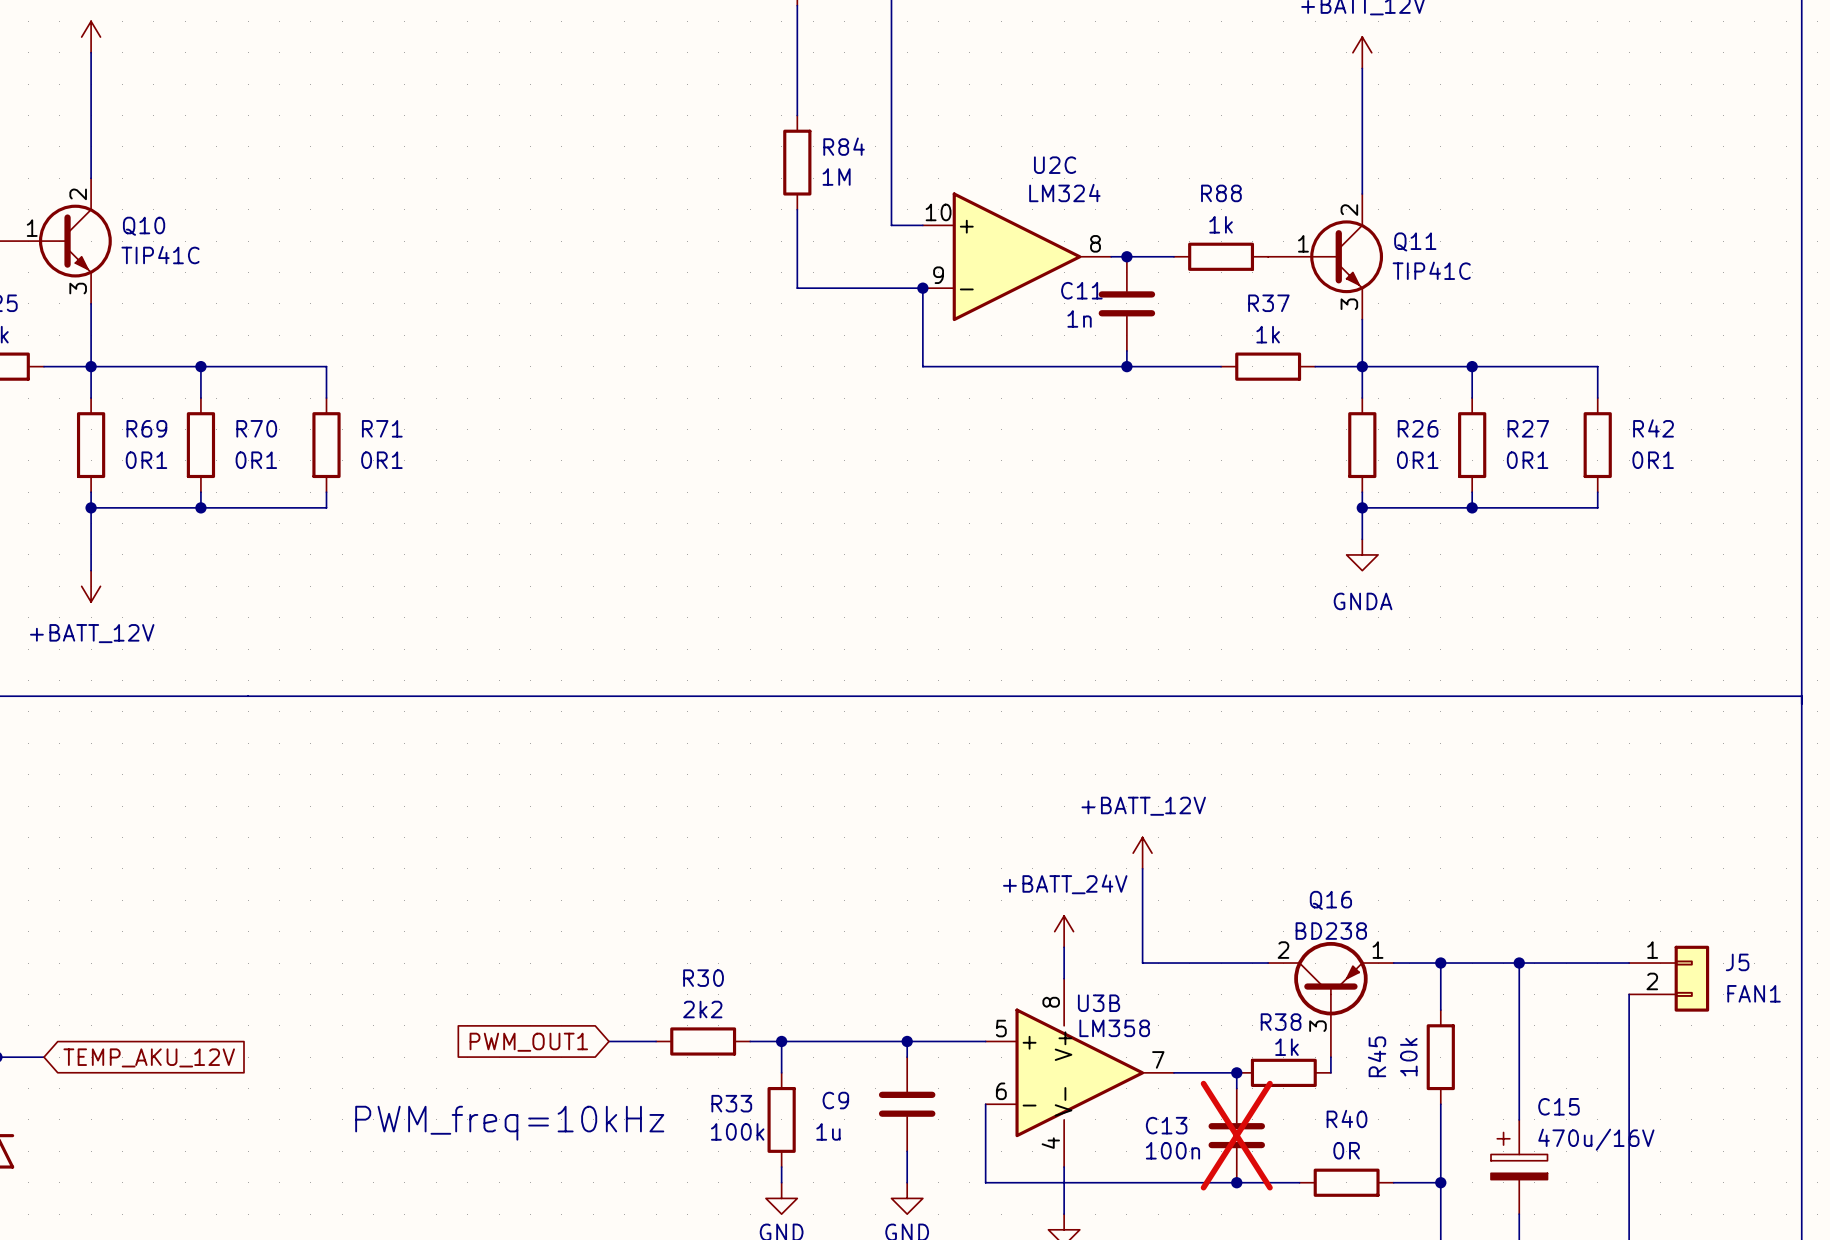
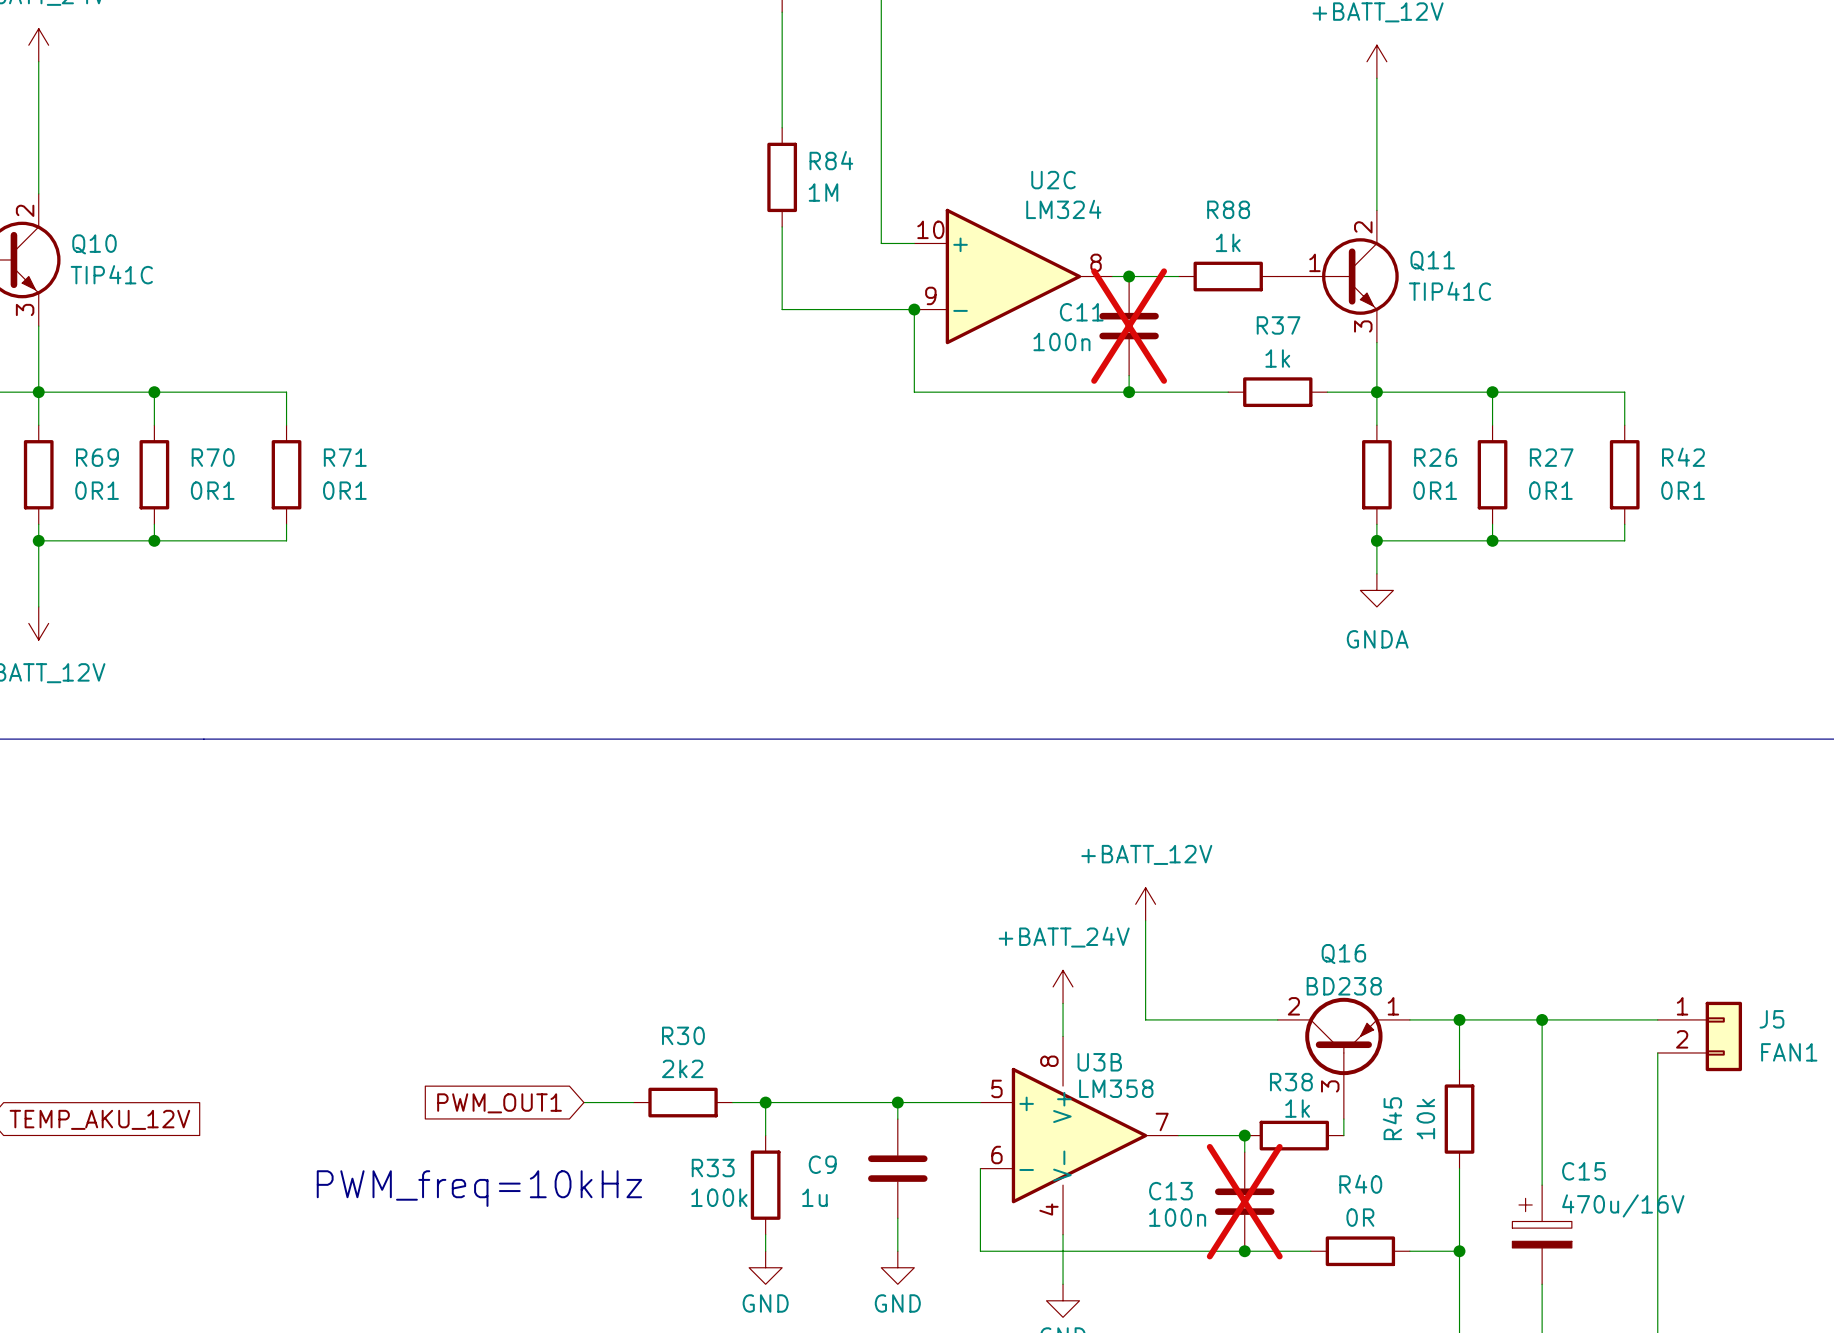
C11 do-not-place cross: none -> (1129, 326)
C11 value: 1n (1079, 318) -> 100n (1061, 341)

